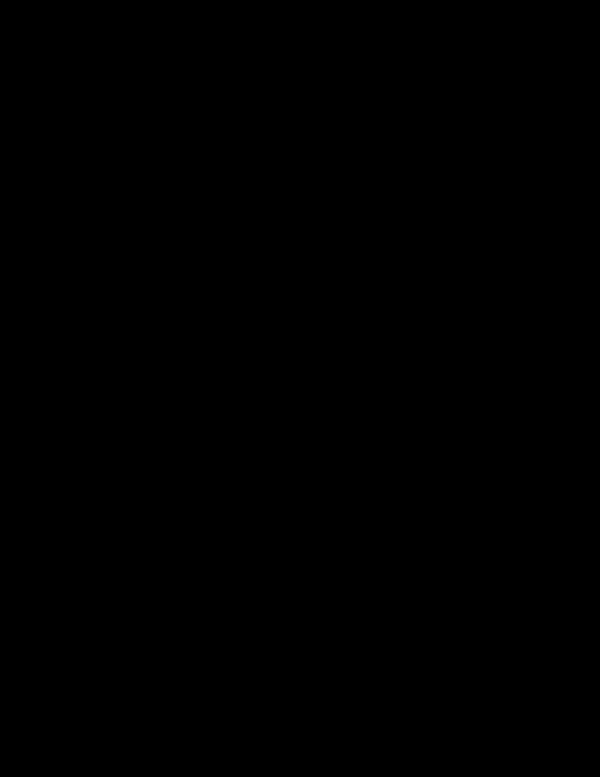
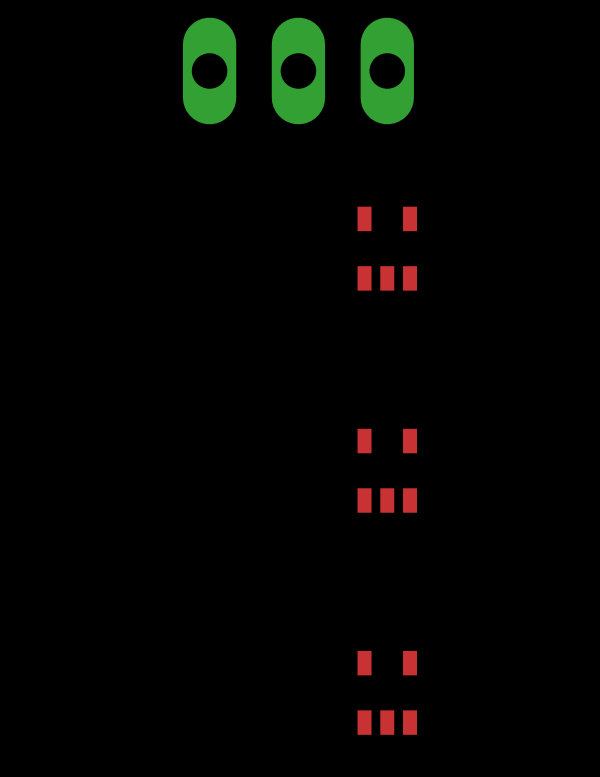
part: none -> (298, 70)
part: none -> (387, 248)
part: none -> (387, 470)
part: none -> (387, 692)

